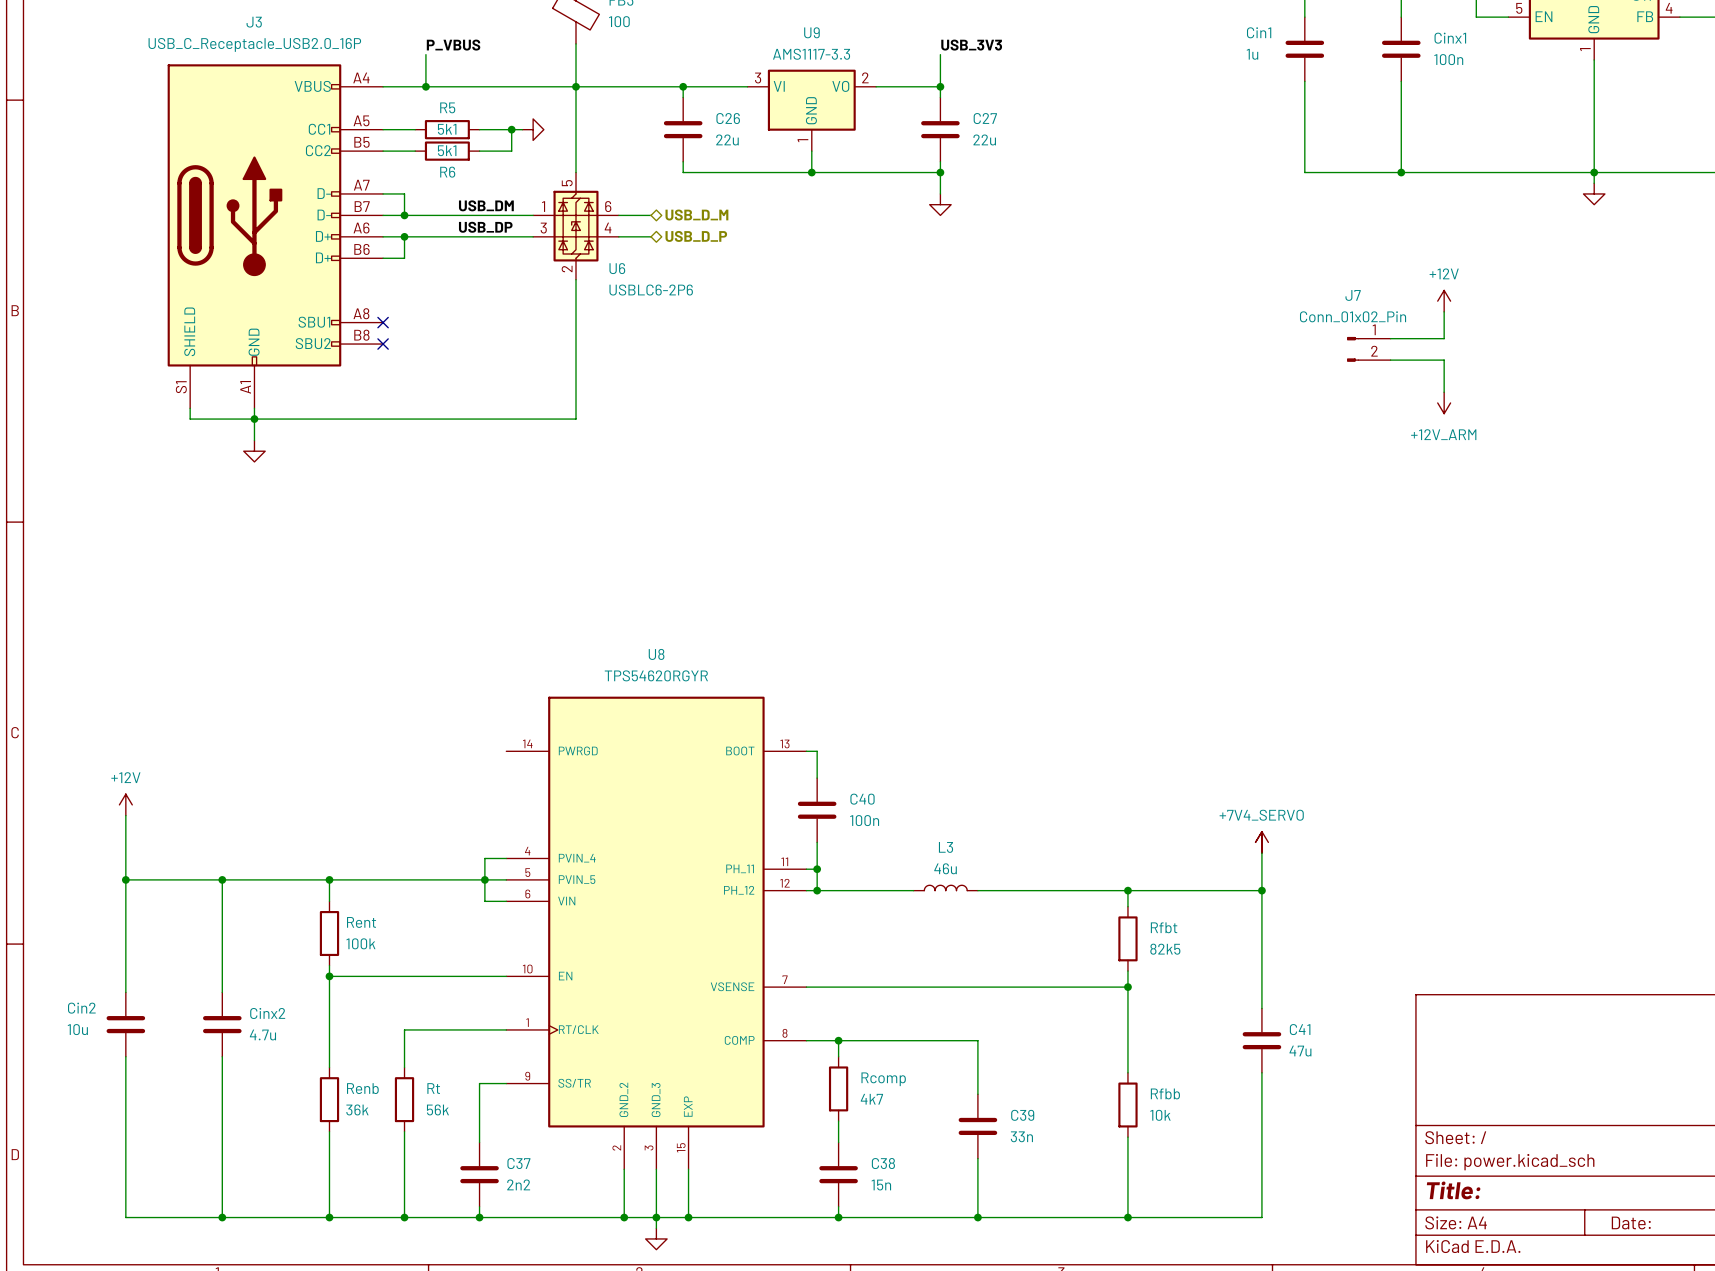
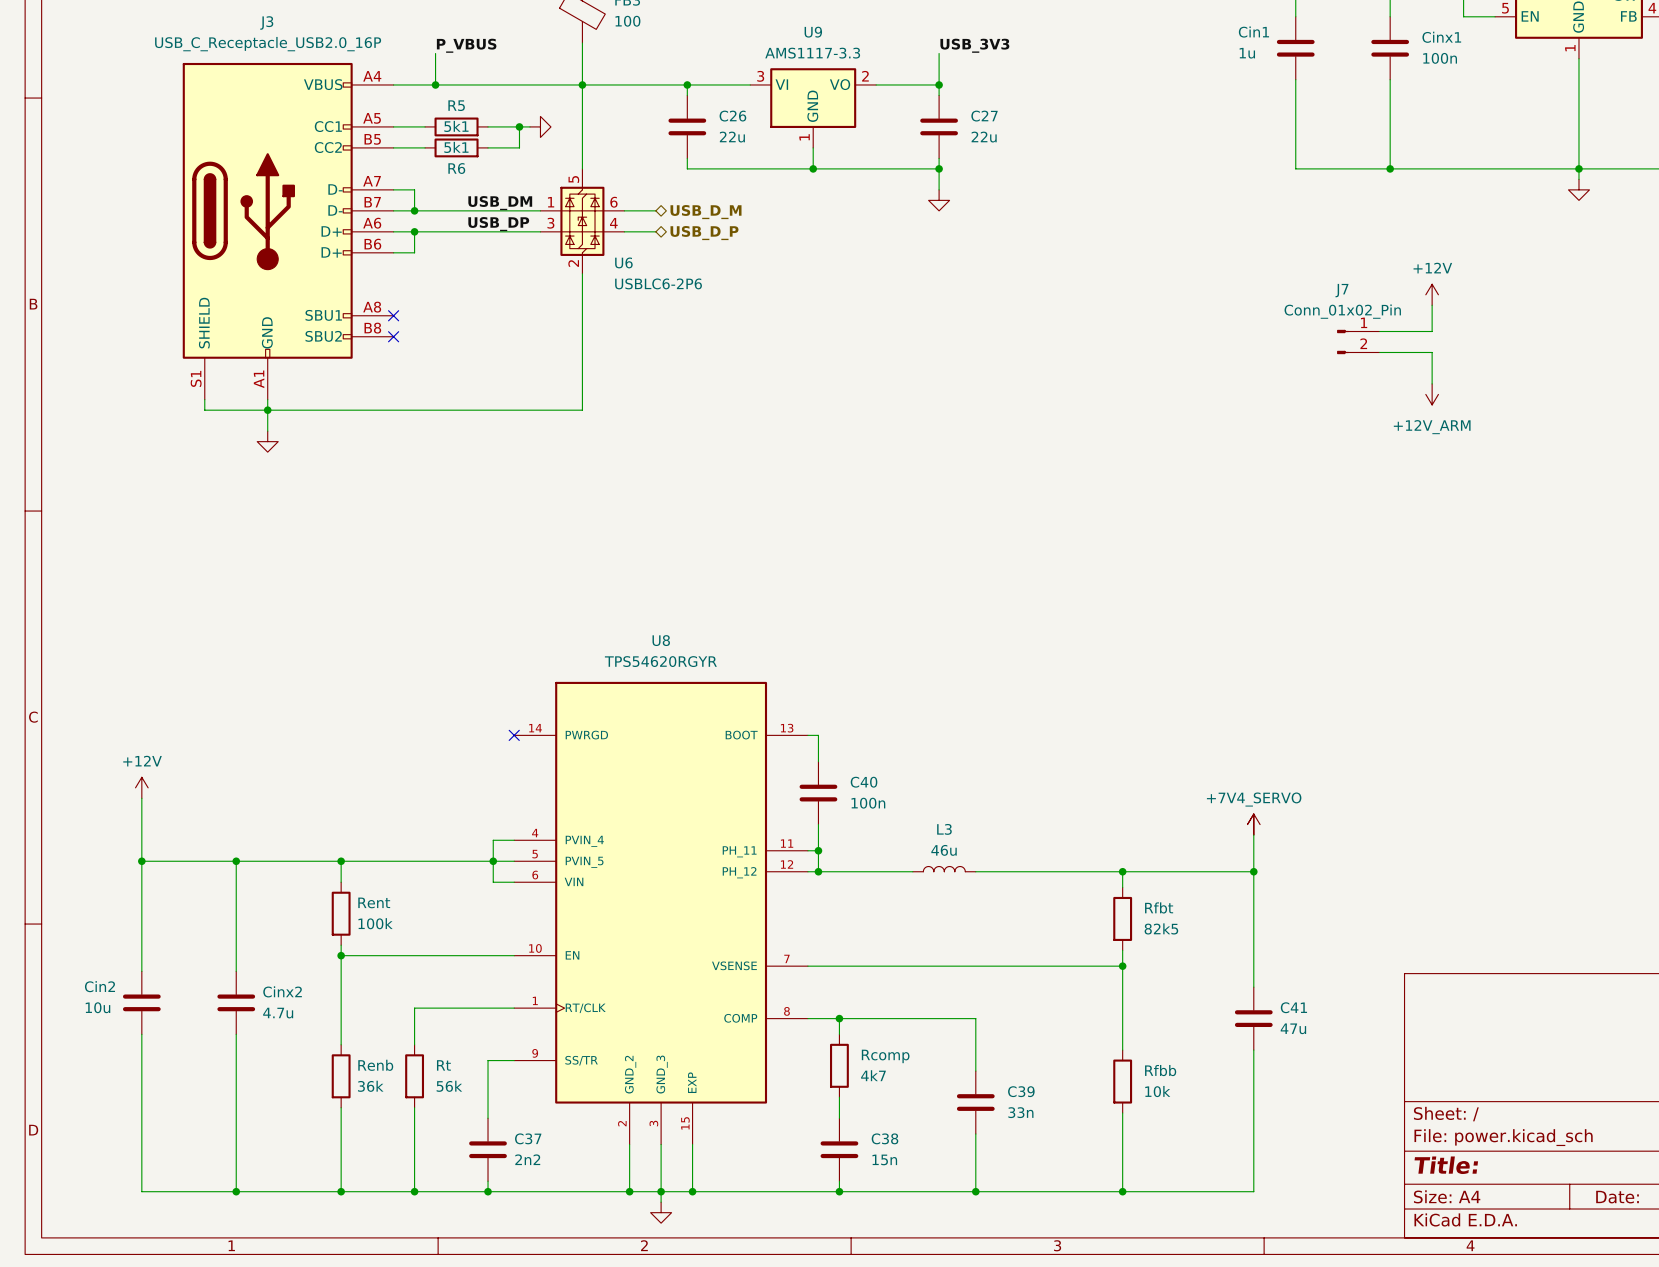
no-connect mark: none -> (514, 735)

